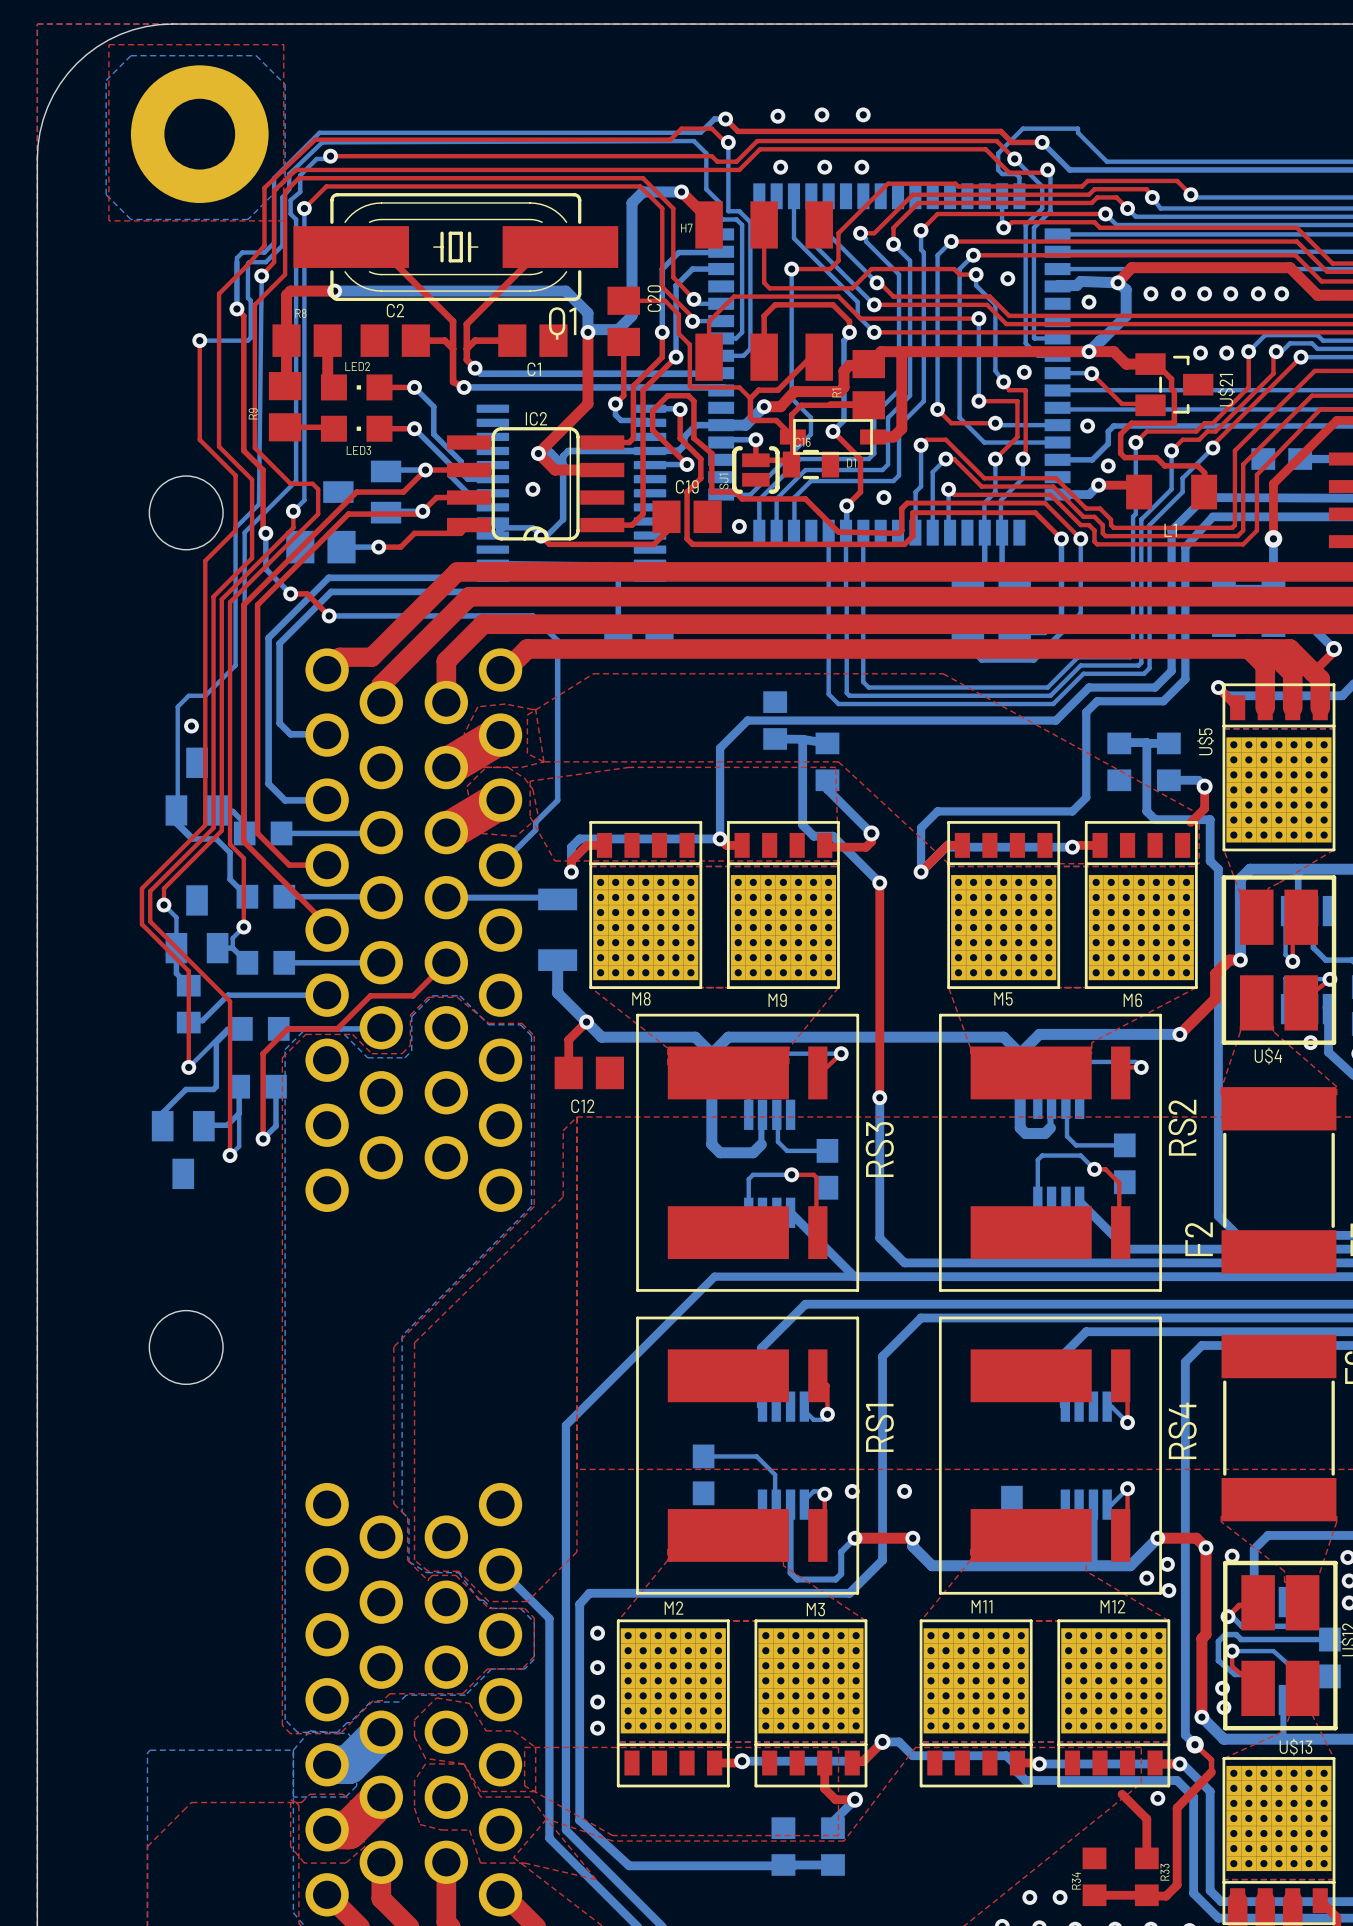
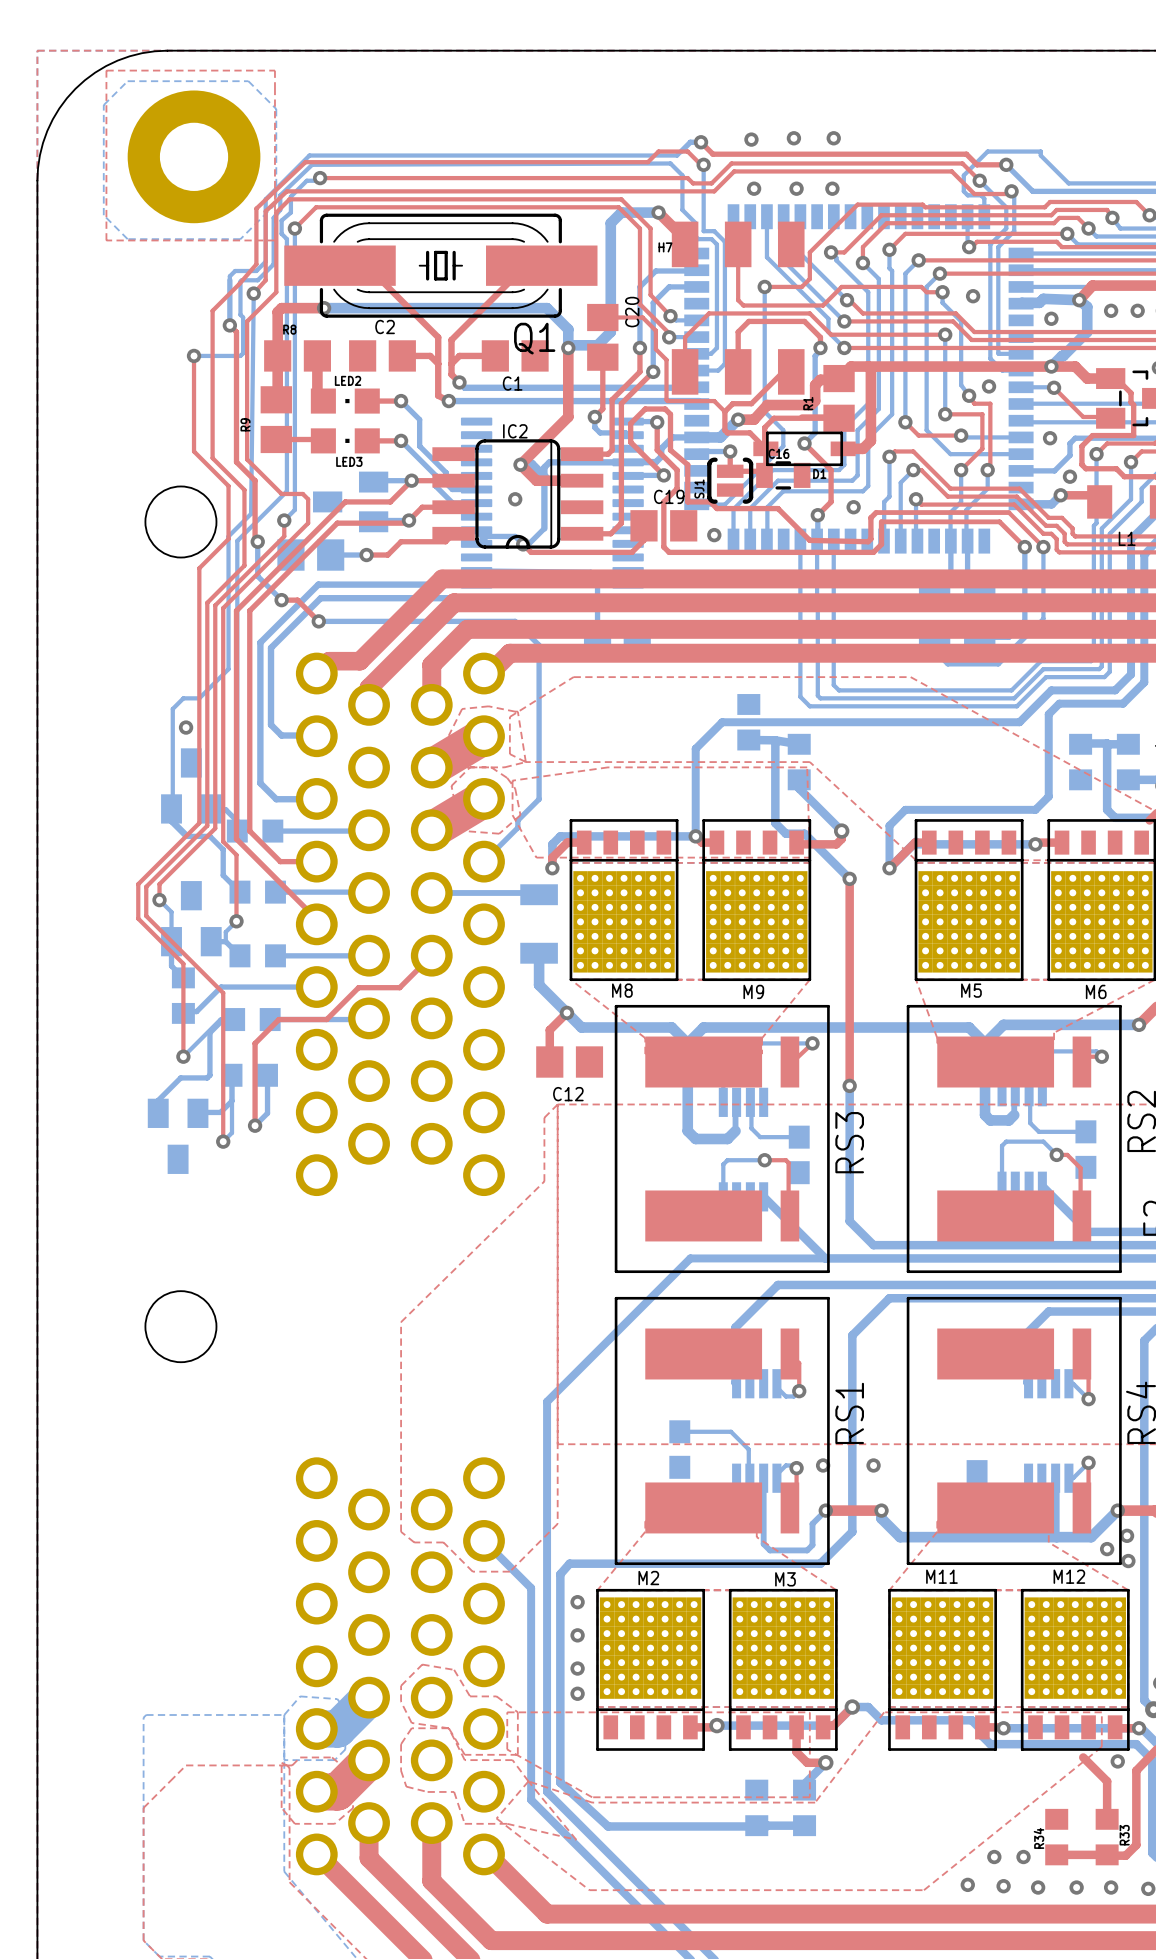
bottom zone outline: (432, 995) (411, 1016) (411, 1050) (404, 1057) (367, 1057) (337, 1027) (307, 1027) (285, 1049) (285, 1719) (297, 1732) (337, 1732) (370, 1702) (399, 1702) (406, 1695) (465, 1695) (491, 1668) (524, 1668) (534, 1659) (534, 1622) (520, 1608) (491, 1608) (483, 1600) (479, 1600) (458, 1572) (426, 1572) (409, 1561) (409, 1518) (402, 1512) (402, 1335) (531, 1206) (531, 1035) (520, 1024) (488, 1024) (459, 995) (432, 995) -> none
top zone outline: (428, 997) (410, 1015) (410, 1045) (402, 1053) (371, 1053) (352, 1034) (305, 1034) (282, 1057) (282, 1725) (290, 1733) (340, 1733) (373, 1700) (382, 1700) (389, 1693) (462, 1693) (487, 1668) (521, 1668) (534, 1656) (534, 1618) (524, 1608) (488, 1608) (455, 1575) (432, 1575) (428, 1580) (407, 1560) (407, 1517) (393, 1503) (393, 1346) (534, 1206) (534, 1035) (521, 1023) (488, 1023) (457, 997) (428, 997) -> none

